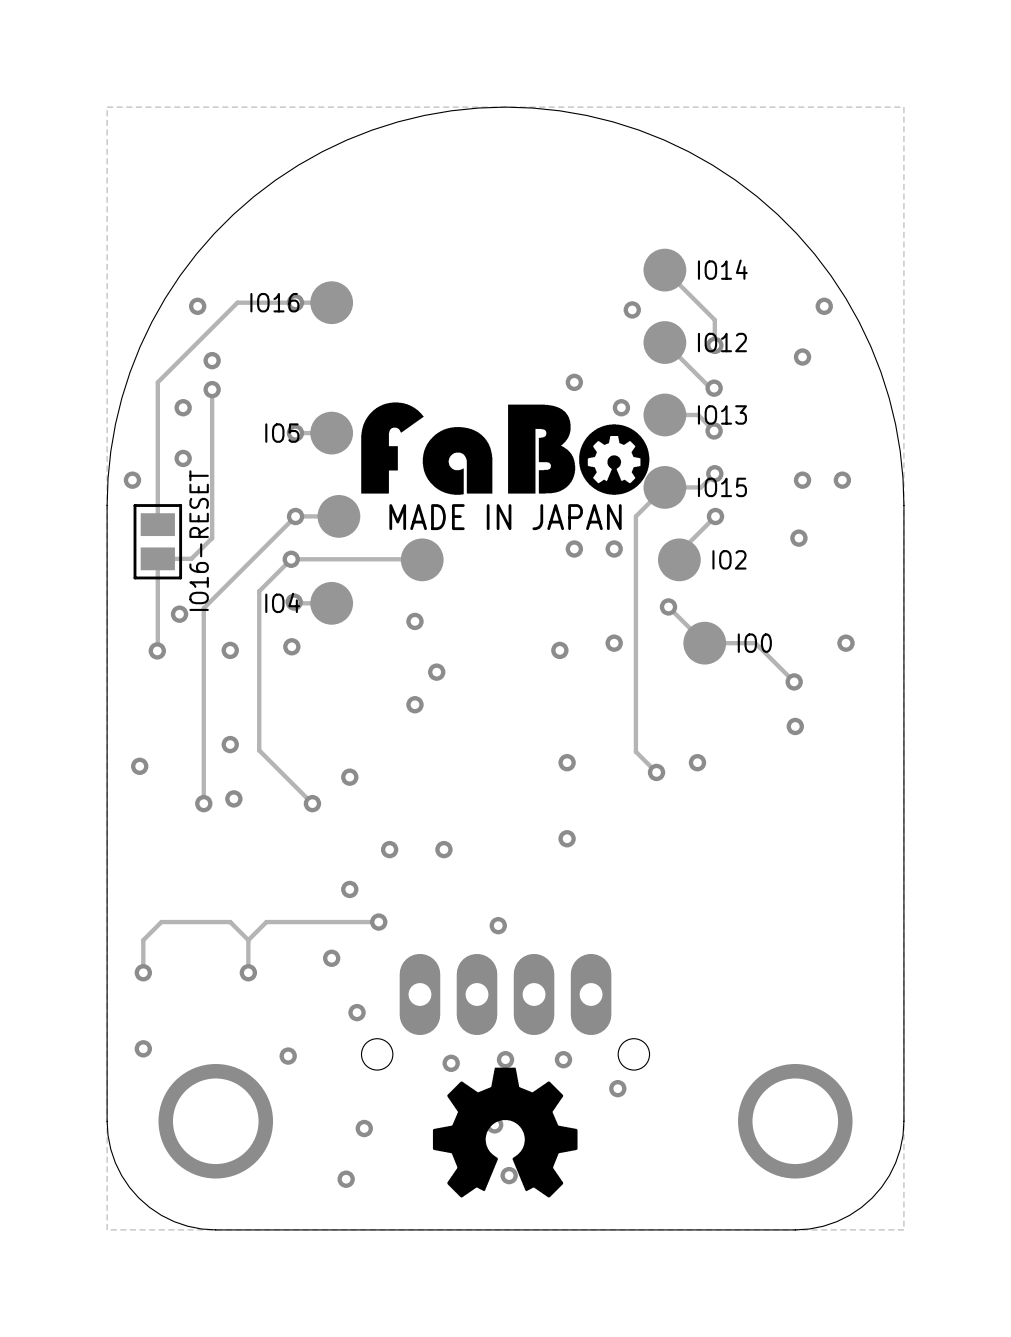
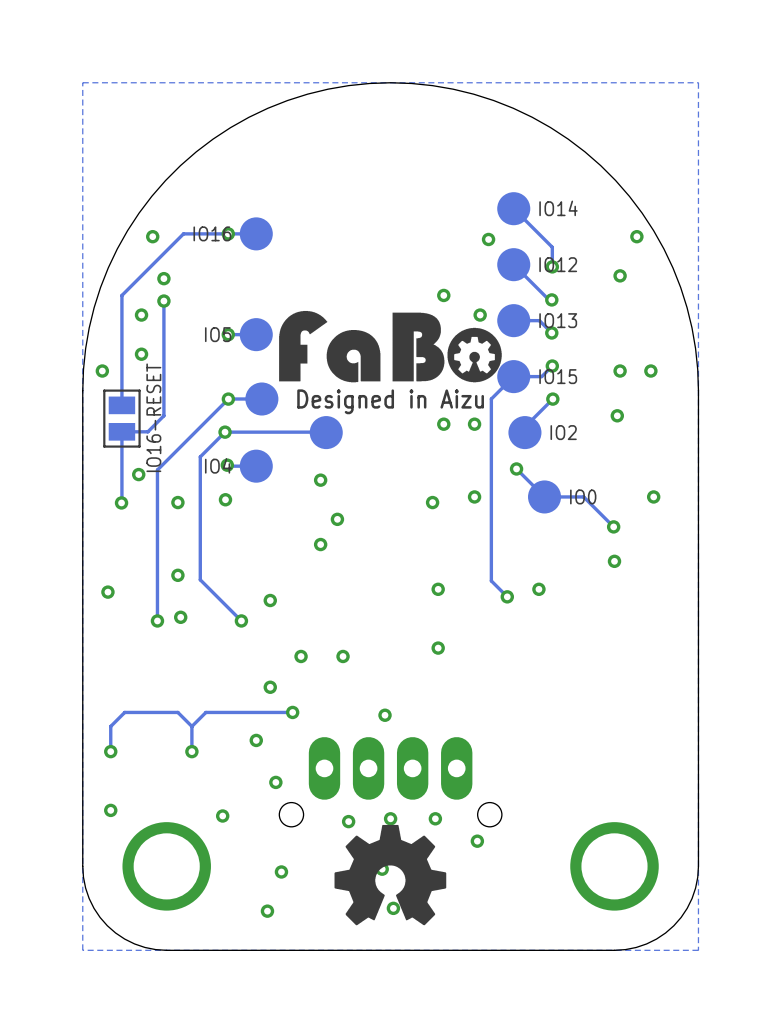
text: MADE IN JAPAN (505, 517) -> Designed in Aizu (390, 401)

